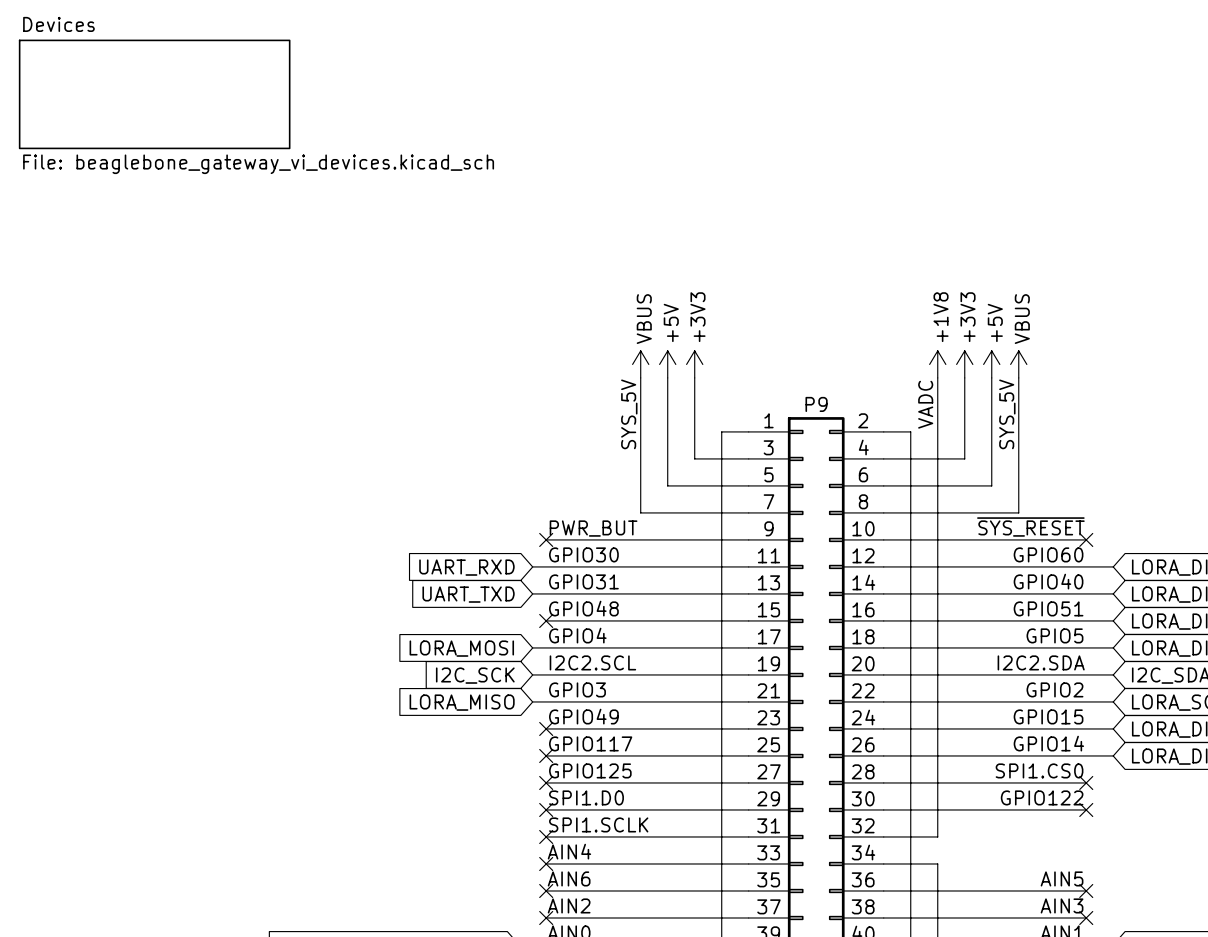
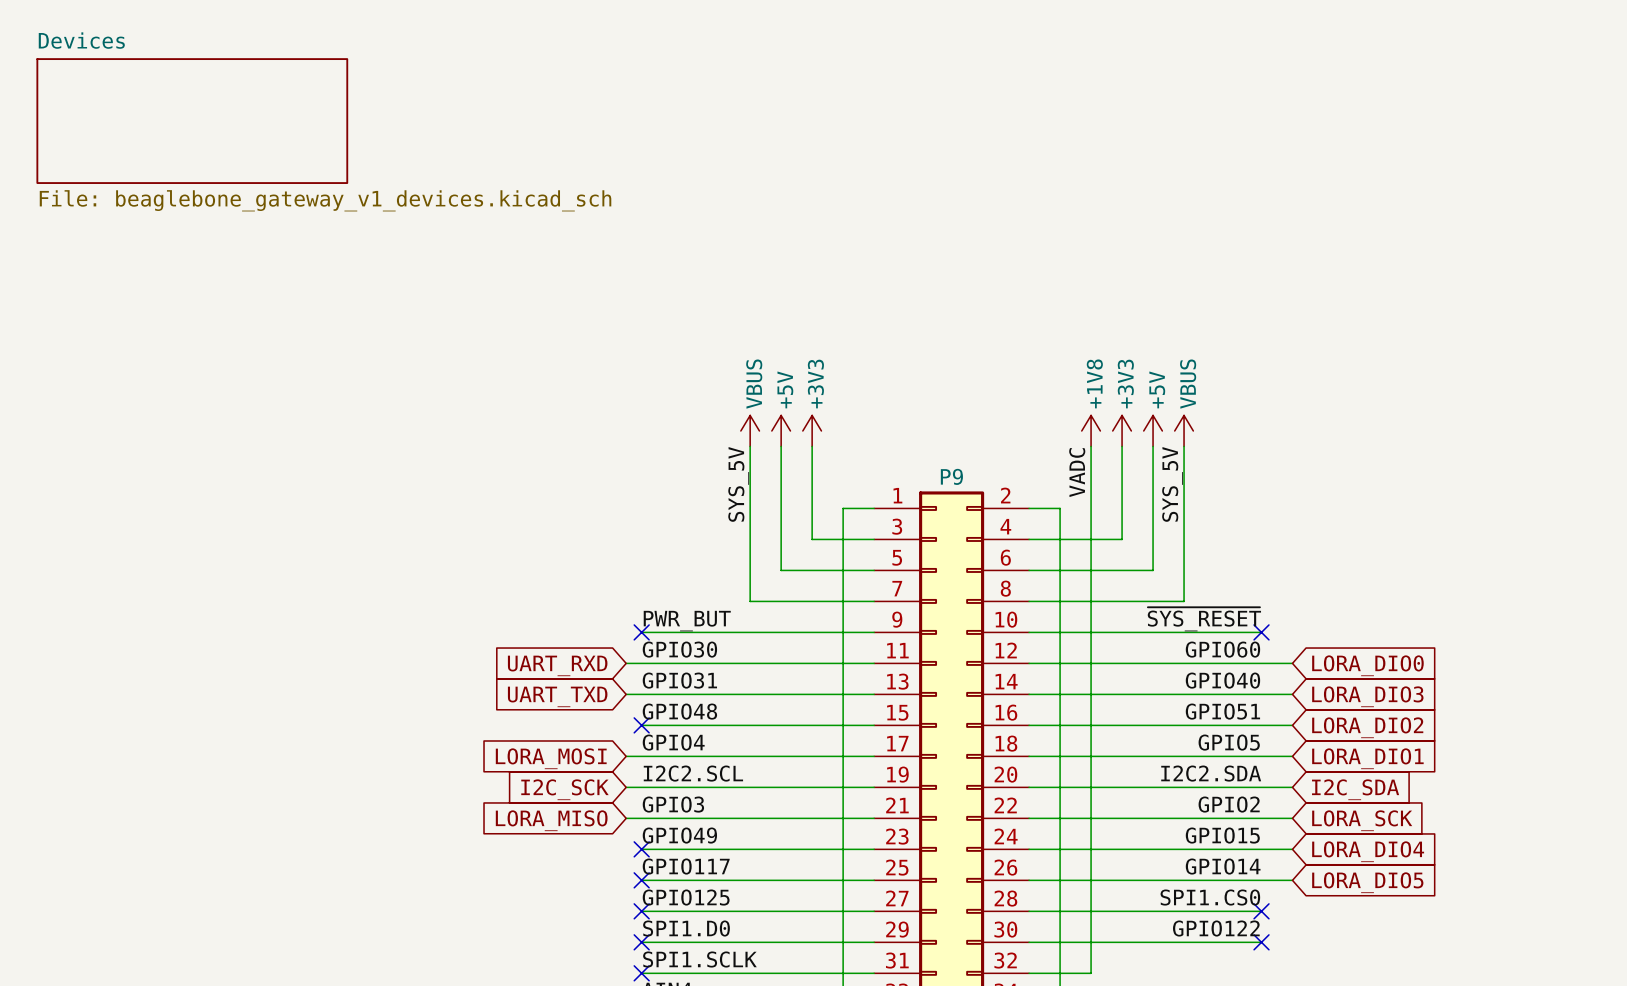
sheet Devices value: File: beaglebone_gateway_vi_devices.kicad_sch (258, 164) -> File: beaglebone_gateway_v1_devices.kicad_sch (325, 200)

